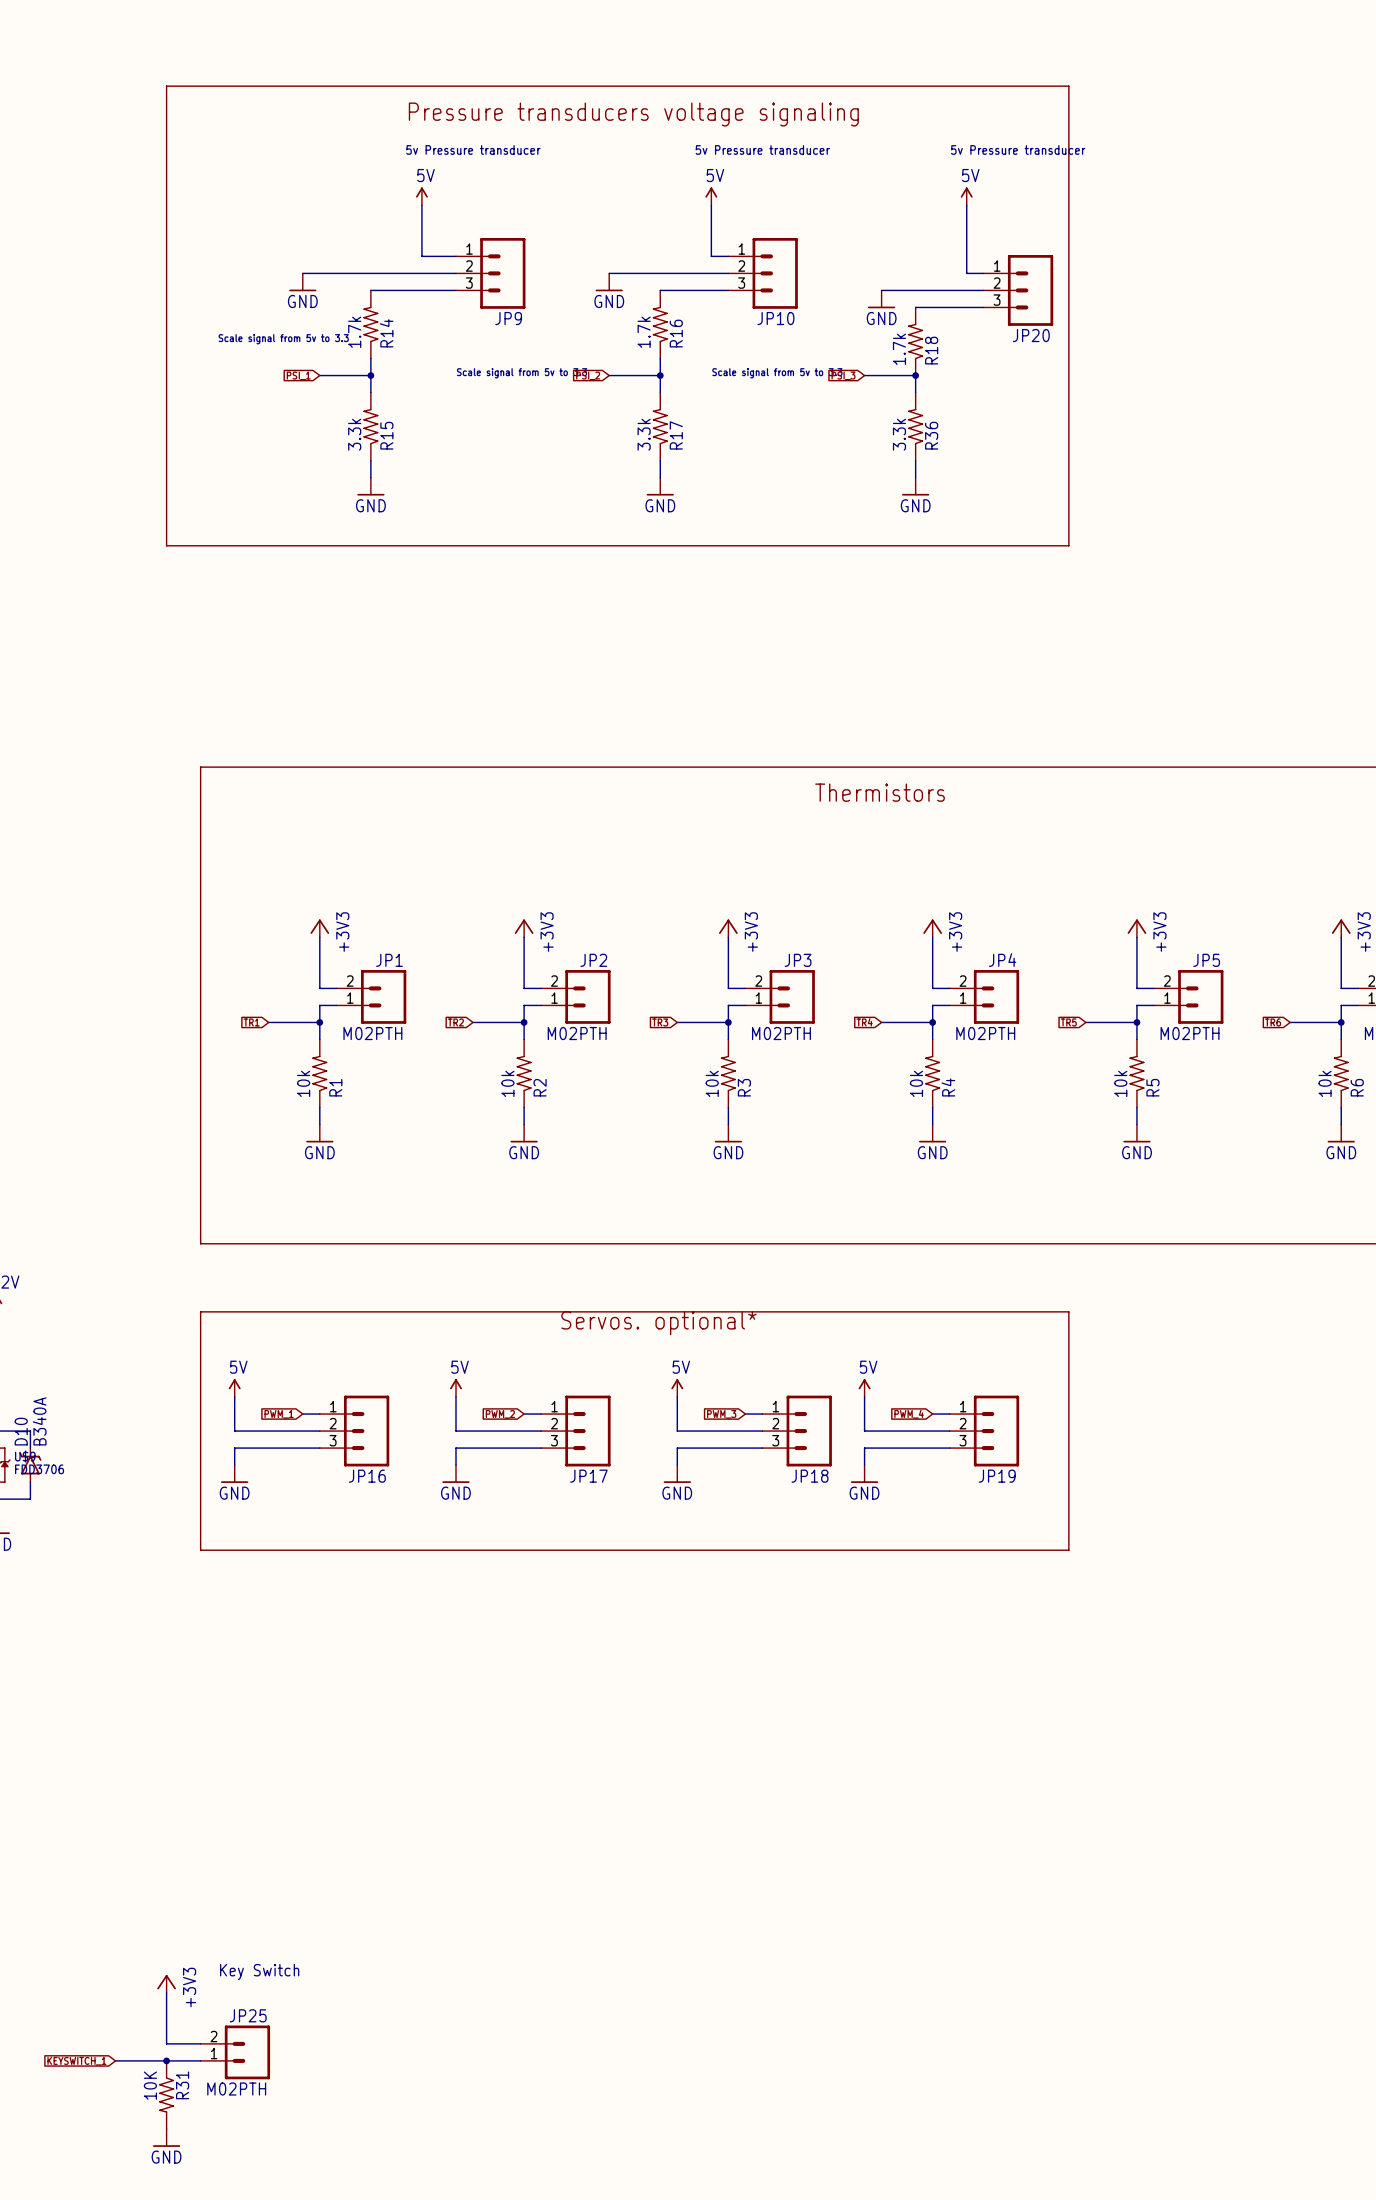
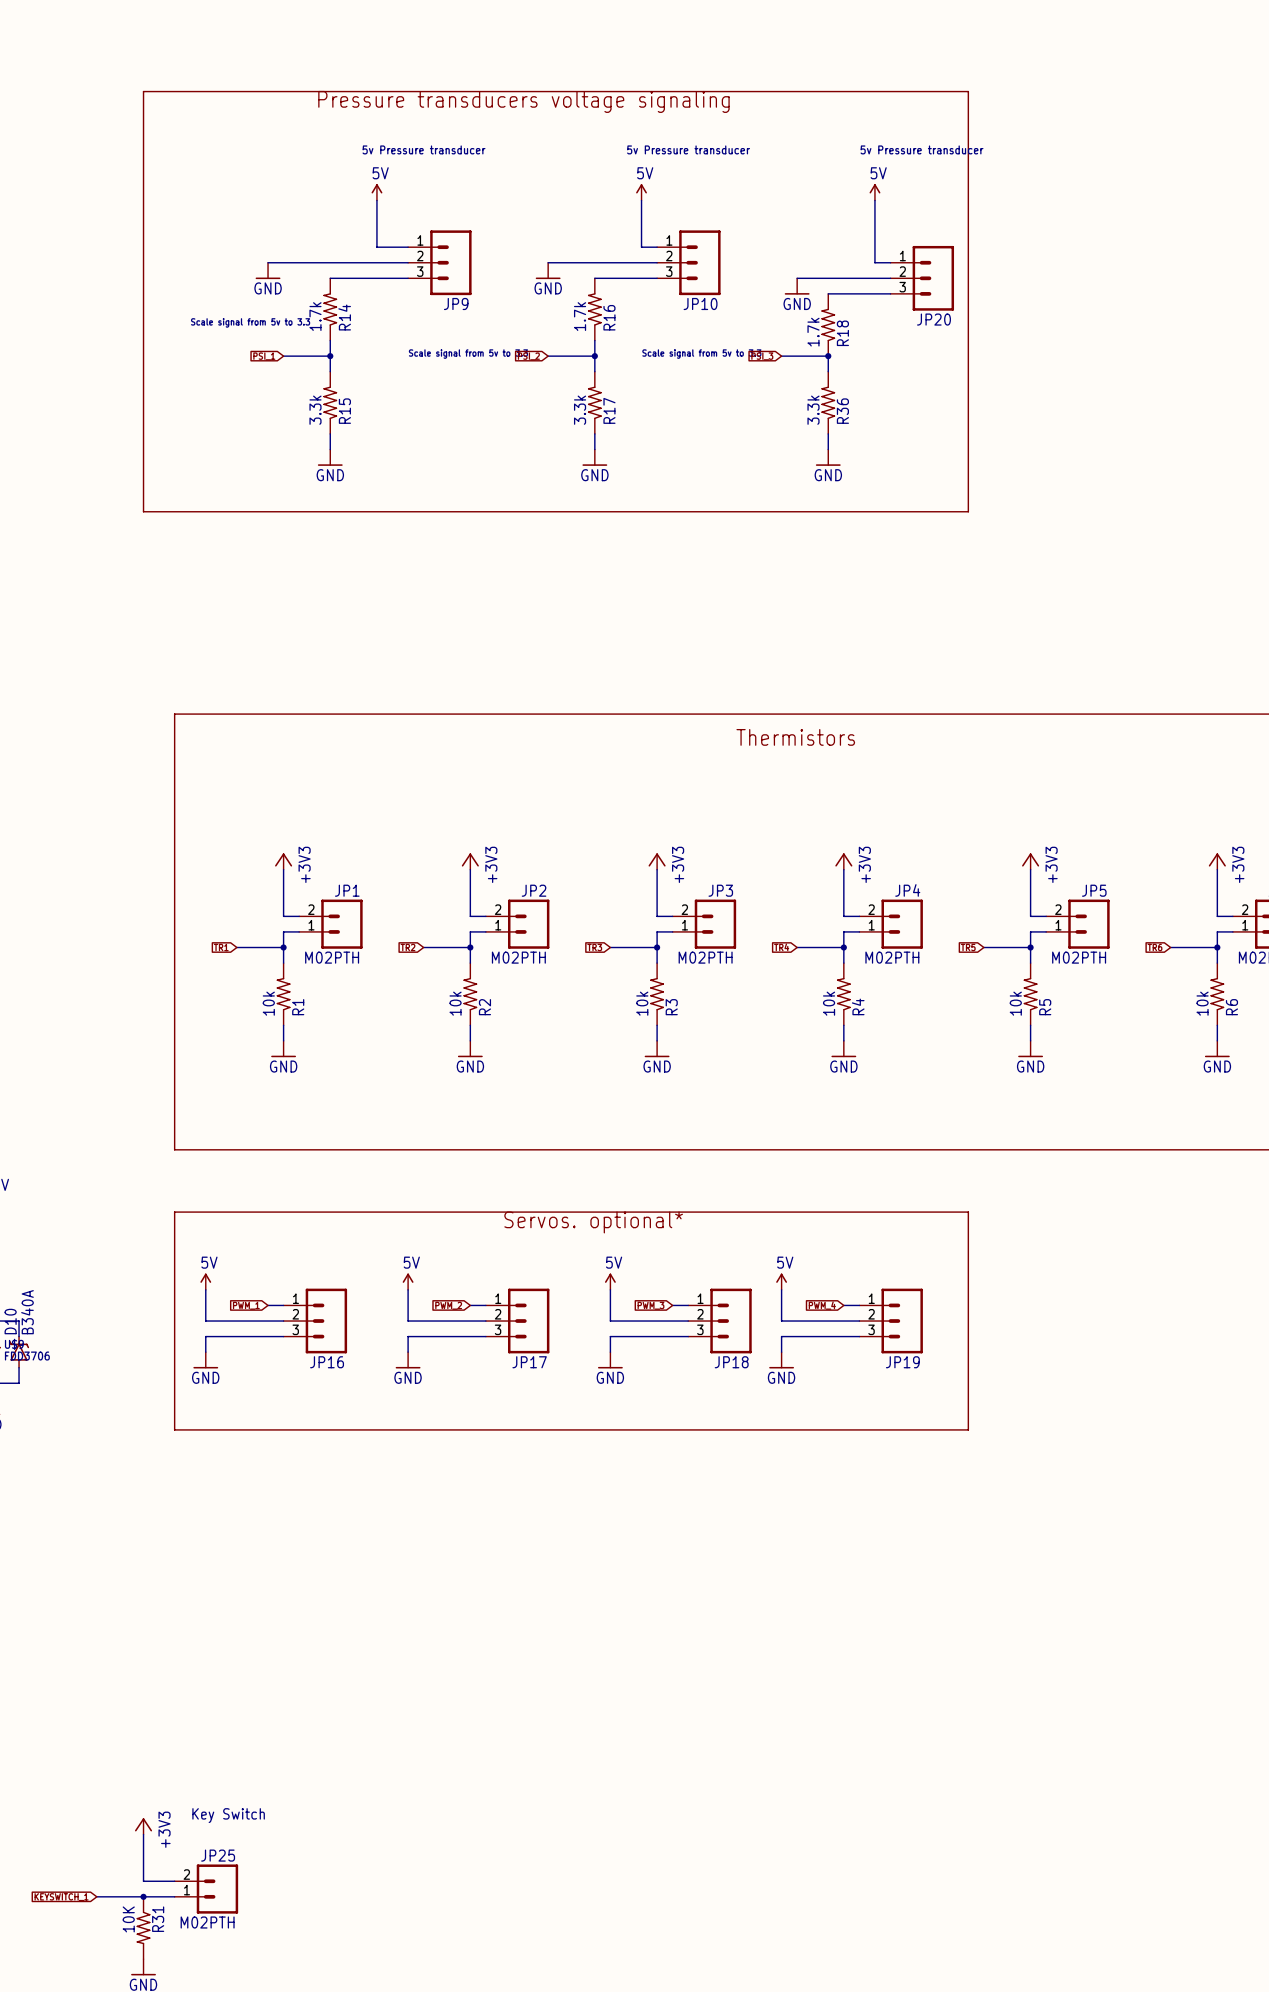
text position: Pressure transducers voltage signaling (633, 114) -> Pressure transducers voltage signaling (523, 101)

